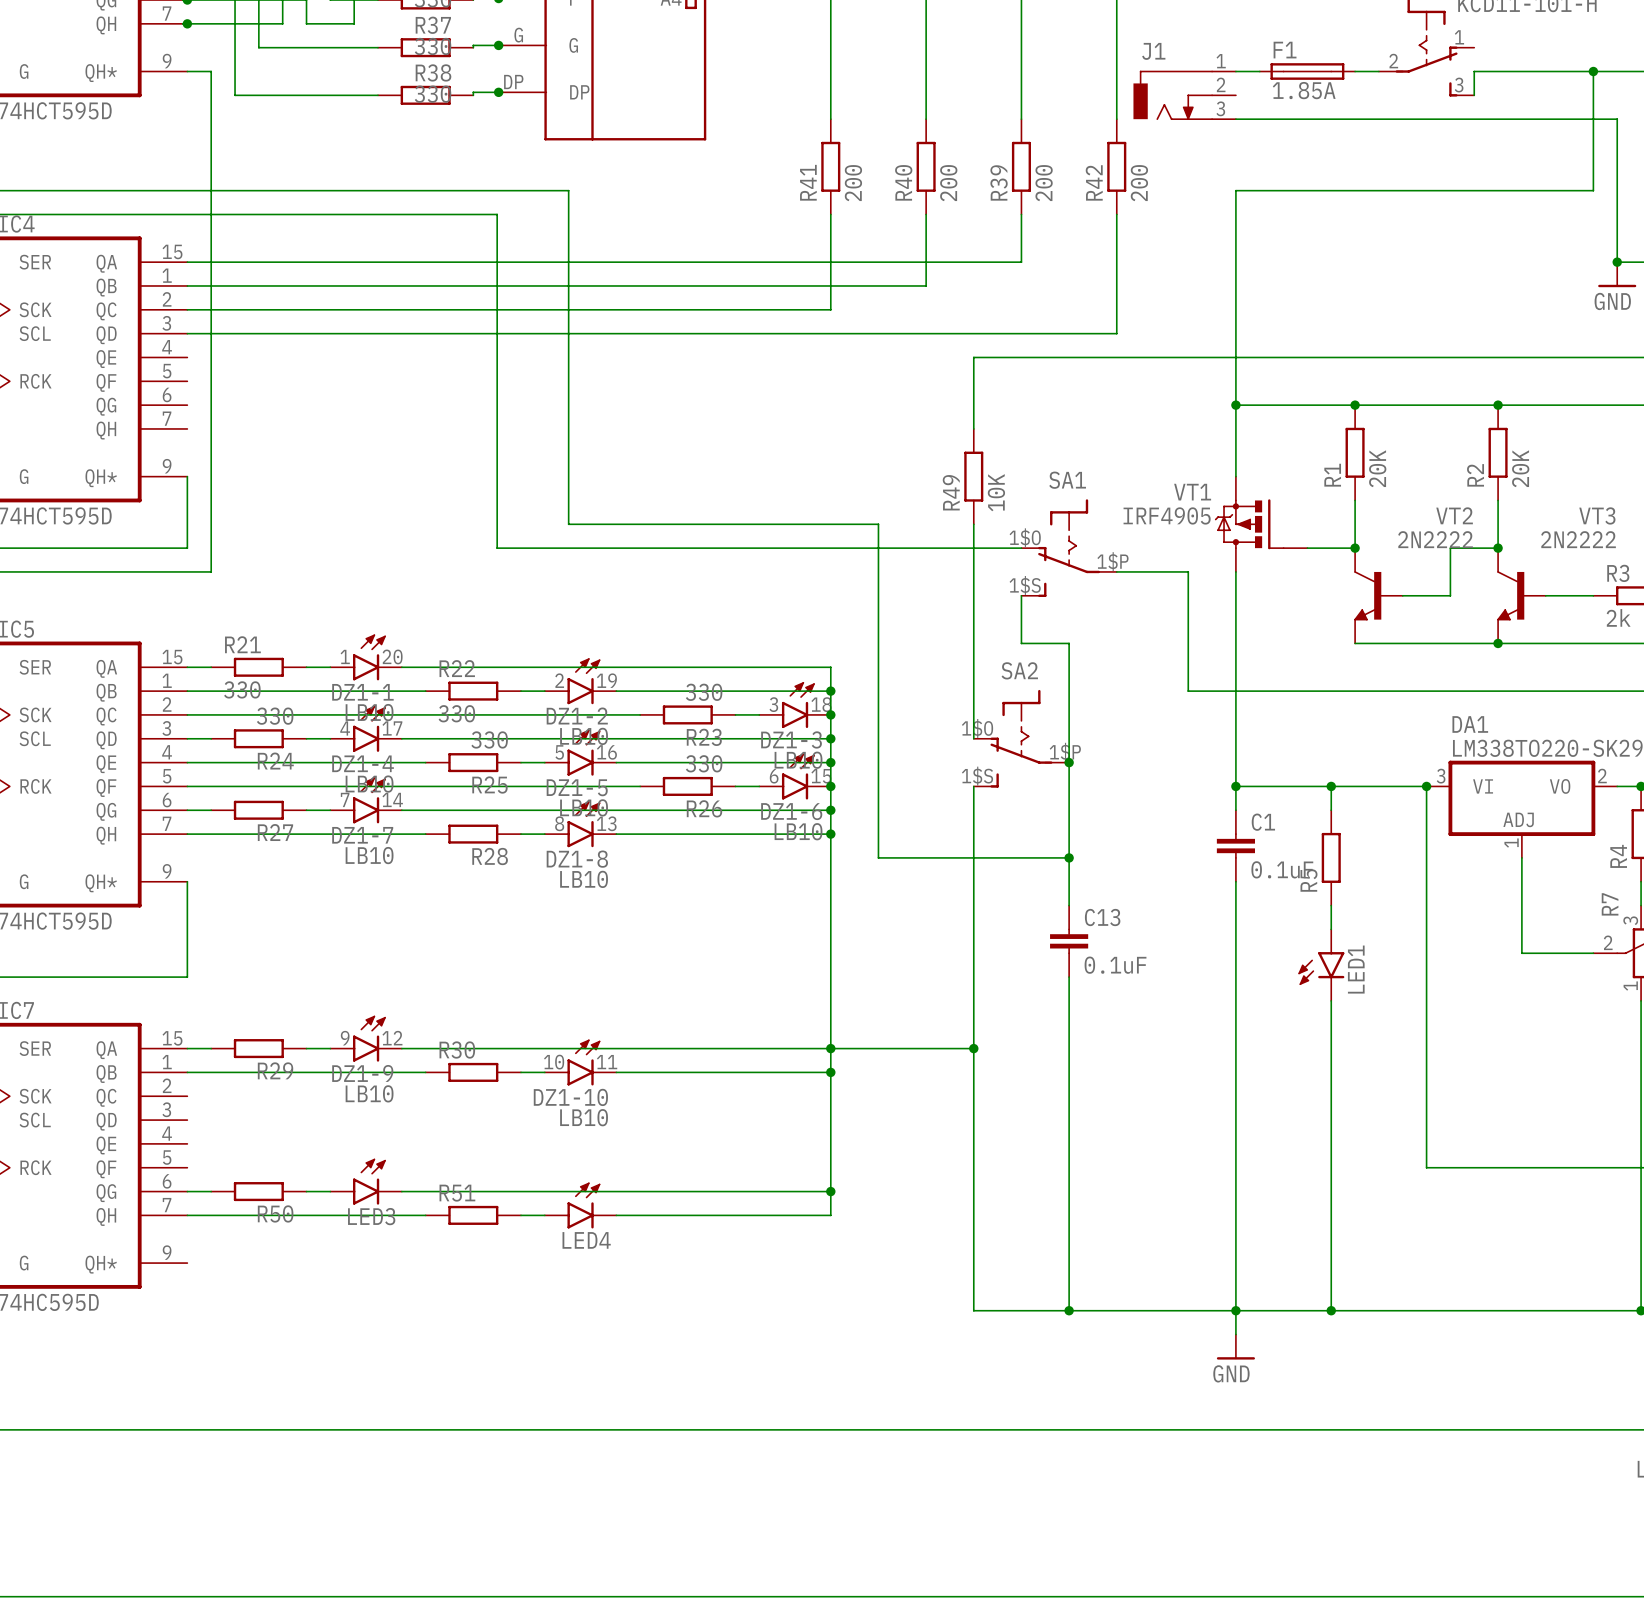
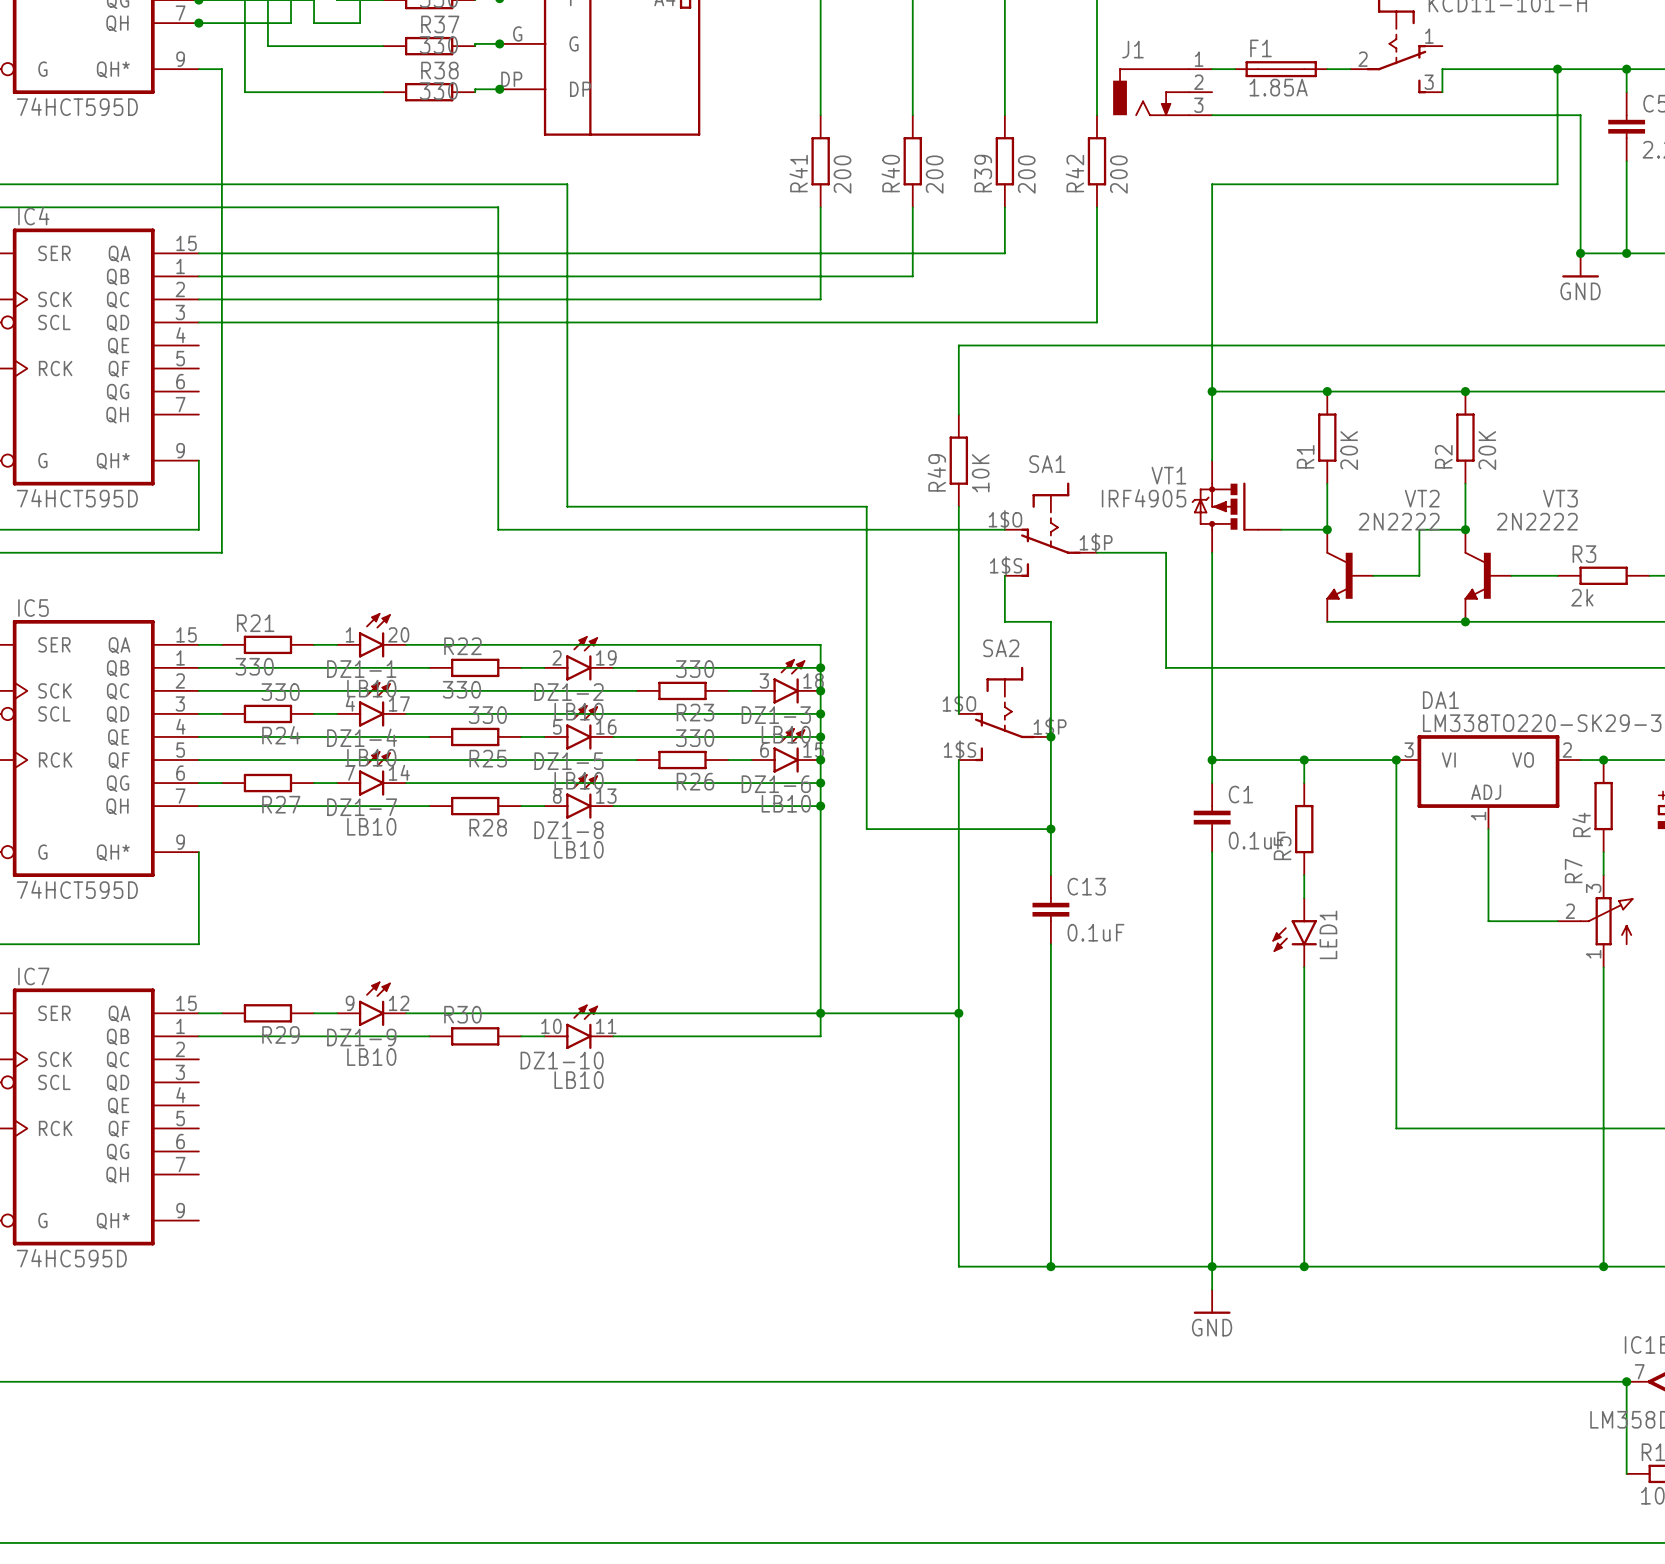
wire: (830, 1072) (830, 1215) (616, 1215) -> none
junction: (830, 1072) -> none
LED3: (366, 1181) -> none
wire: (187, 1191) (211, 1191) -> none
R50: (258, 1191) -> none
wire: (306, 1191) (330, 1191) -> none
wire: (401, 1191) (830, 1191) -> none
junction: (830, 1191) -> none
LED4: (580, 1205) -> none
wire: (187, 1215) (425, 1215) -> none
R51: (473, 1215) -> none
wire: (521, 1215) (544, 1215) -> none

